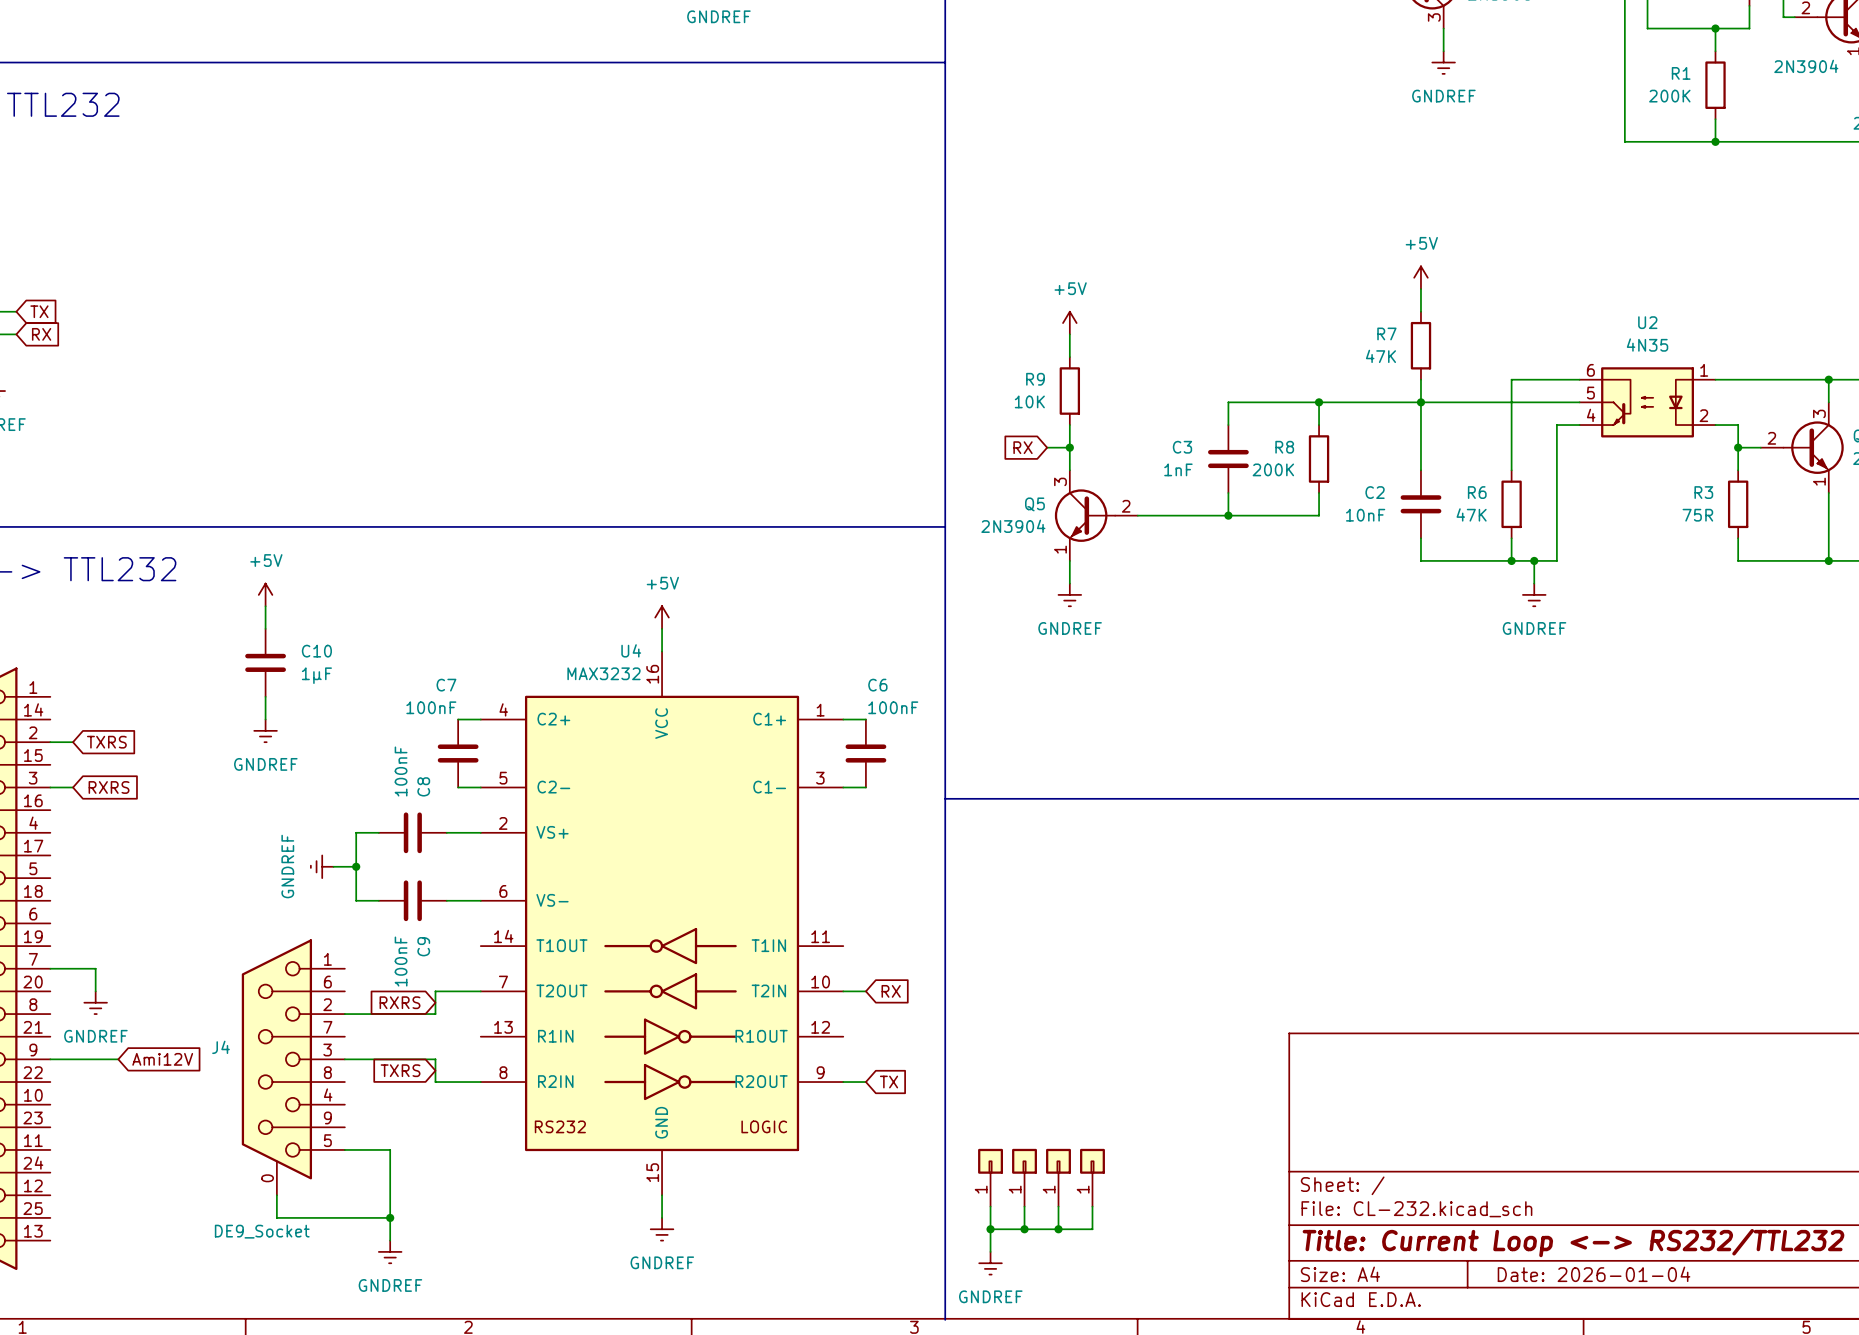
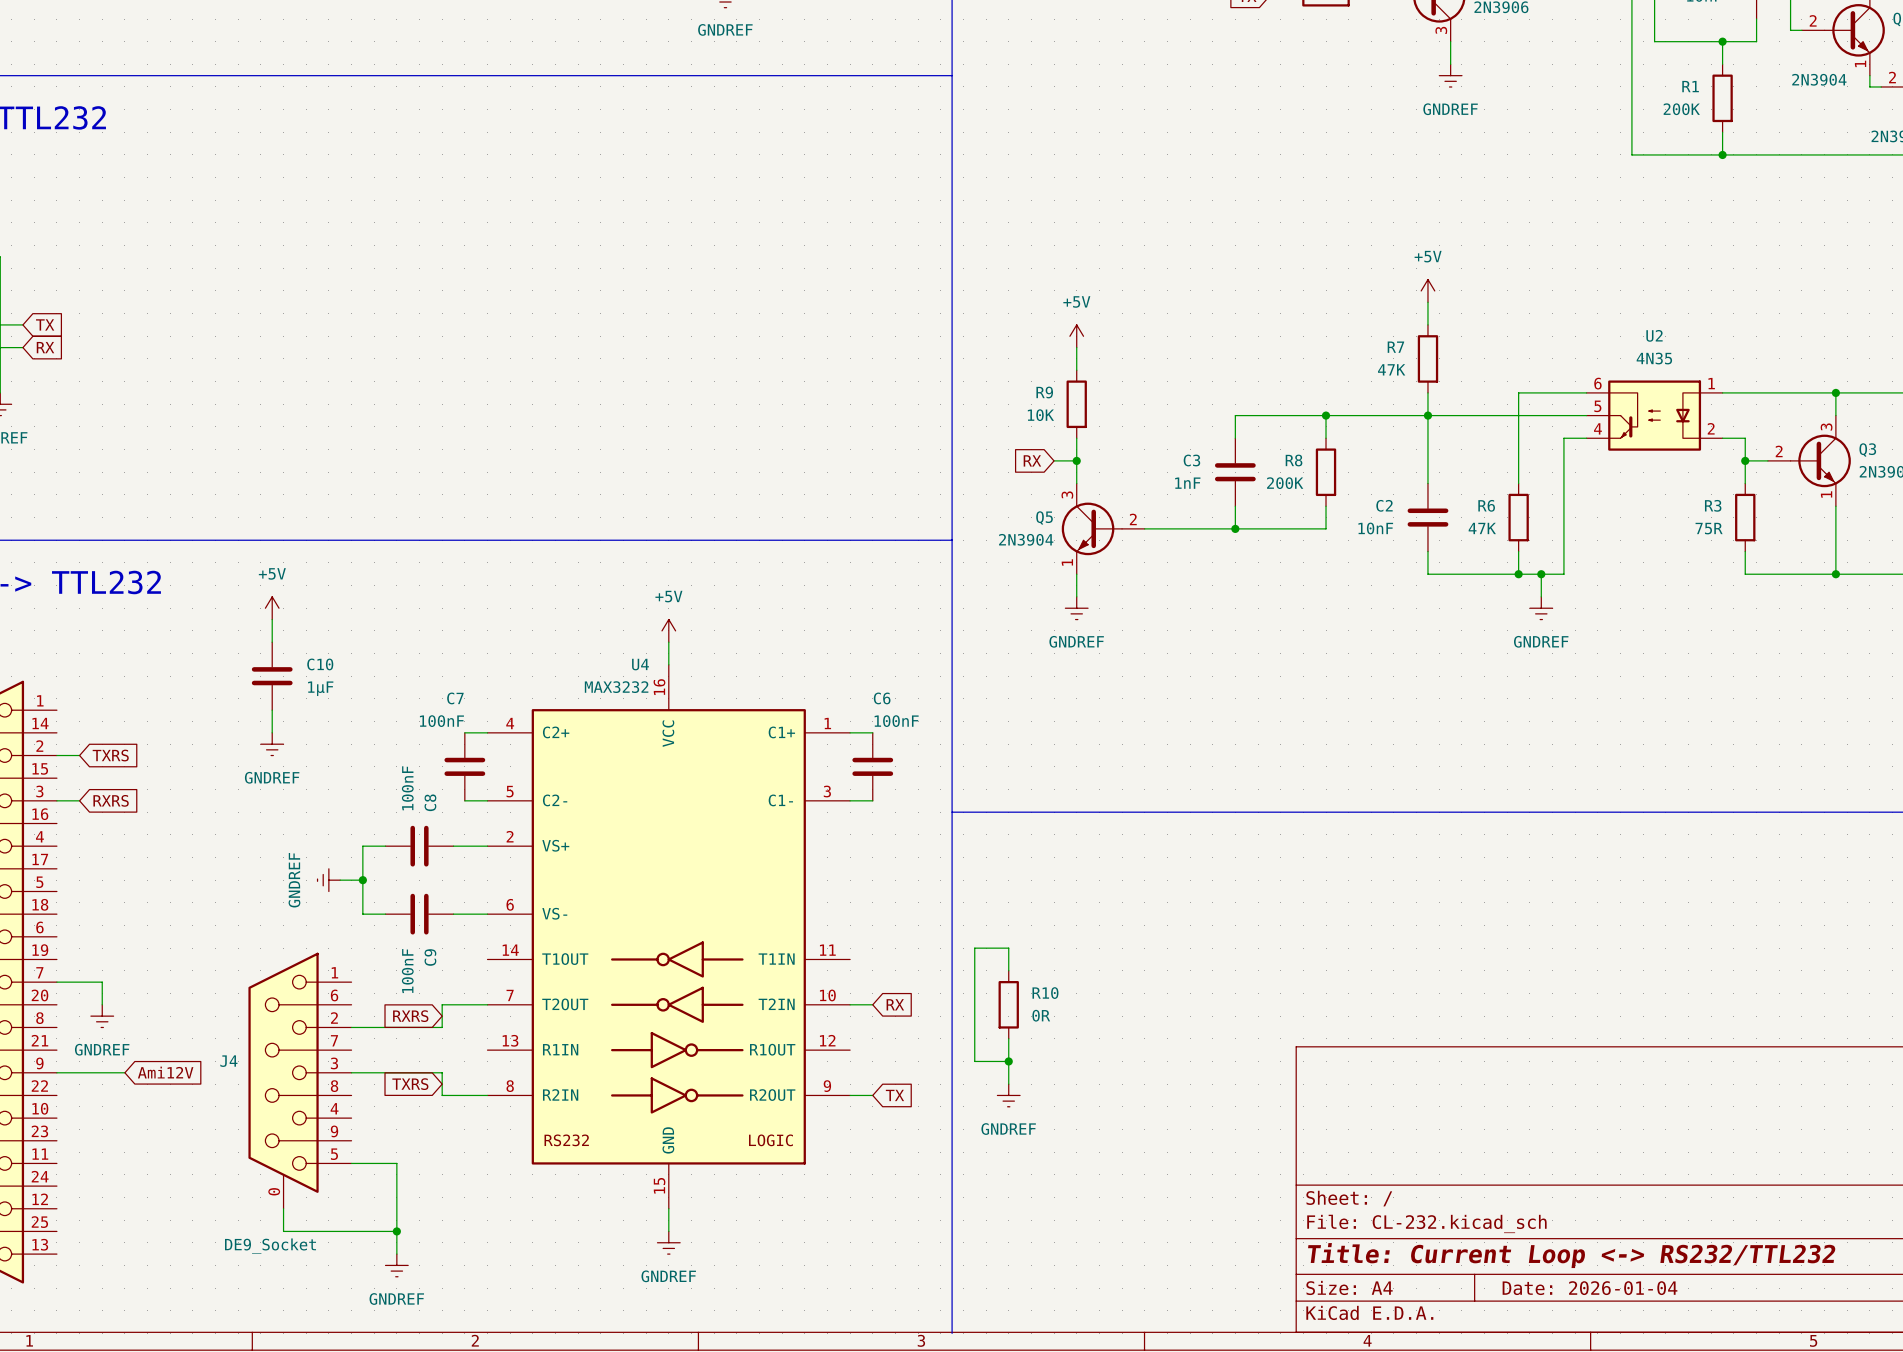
wire: none -> (1008, 970) (1008, 948) (974, 948) (974, 1061) (1008, 1061)
R10: none -> 0R (1008, 1004)
junction: none -> (1008, 1061)
part: (990, 1177) -> none
part: (1024, 1177) -> none
part: (1058, 1177) -> none
part: (1092, 1177) -> none
wire: (990, 1206) (990, 1251) -> (1008, 1038) (1008, 1084)
wire: (1024, 1206) (1024, 1229) -> none
wire: (1058, 1206) (1058, 1229) -> none
wire: (1092, 1206) (1092, 1229) (990, 1229) -> none
junction: (990, 1229) -> none
junction: (1024, 1229) -> none
junction: (1058, 1229) -> none
power symbol position: GNDREF (990, 1263) -> GNDREF (1008, 1095)

